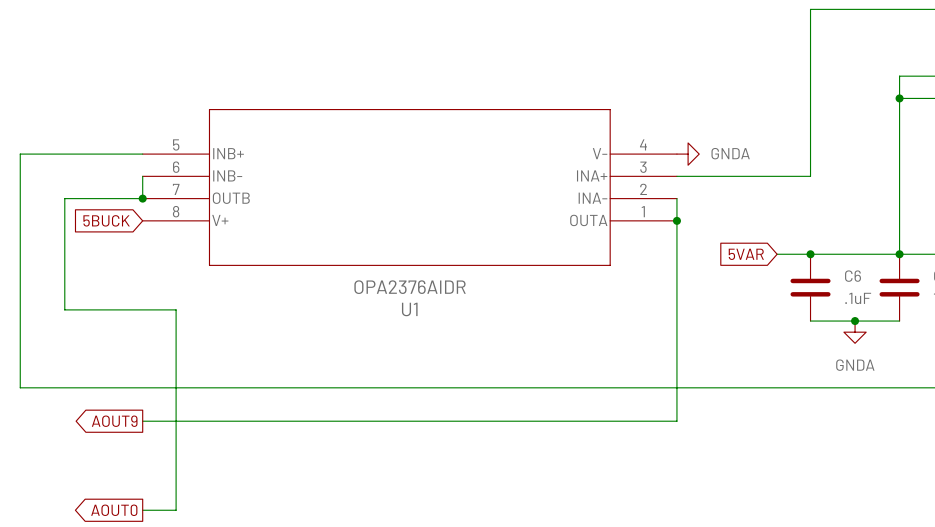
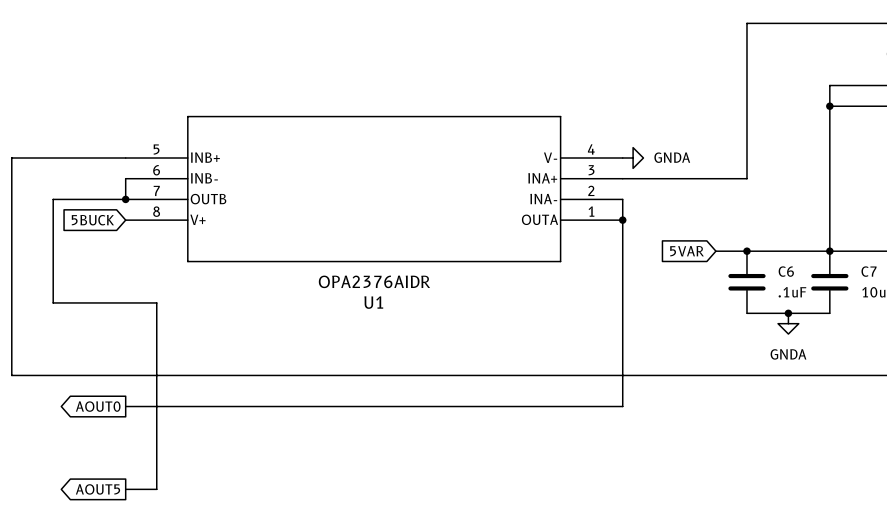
global label: AOUT9 (114, 421) -> AOUT0 (98, 406)
global label: AOUT0 (114, 510) -> AOUT5 (98, 489)

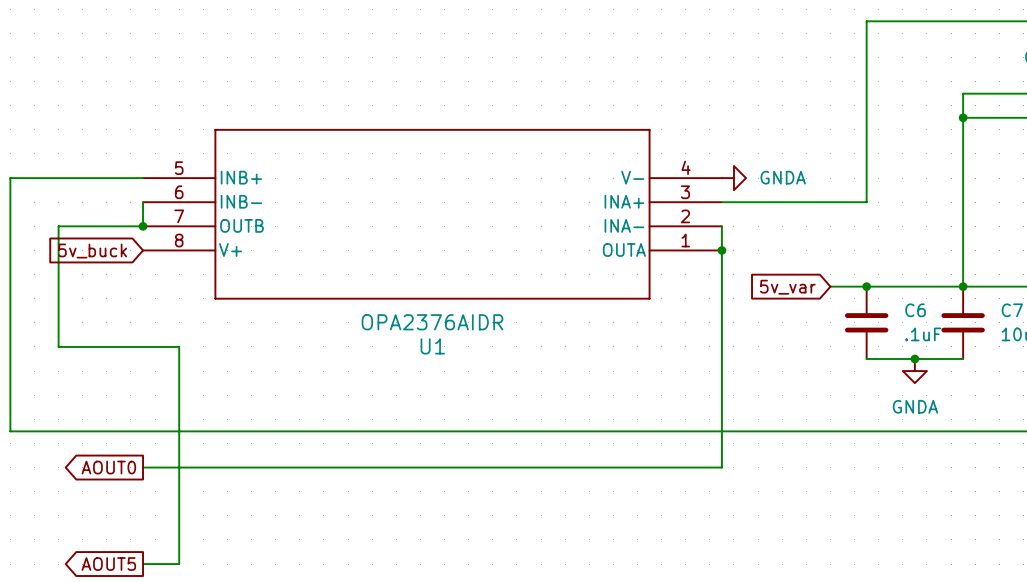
global label: 5BUCK (92, 220) -> 5v_buck (92, 251)
global label: 5VAR (687, 251) -> 5v_var (787, 287)

